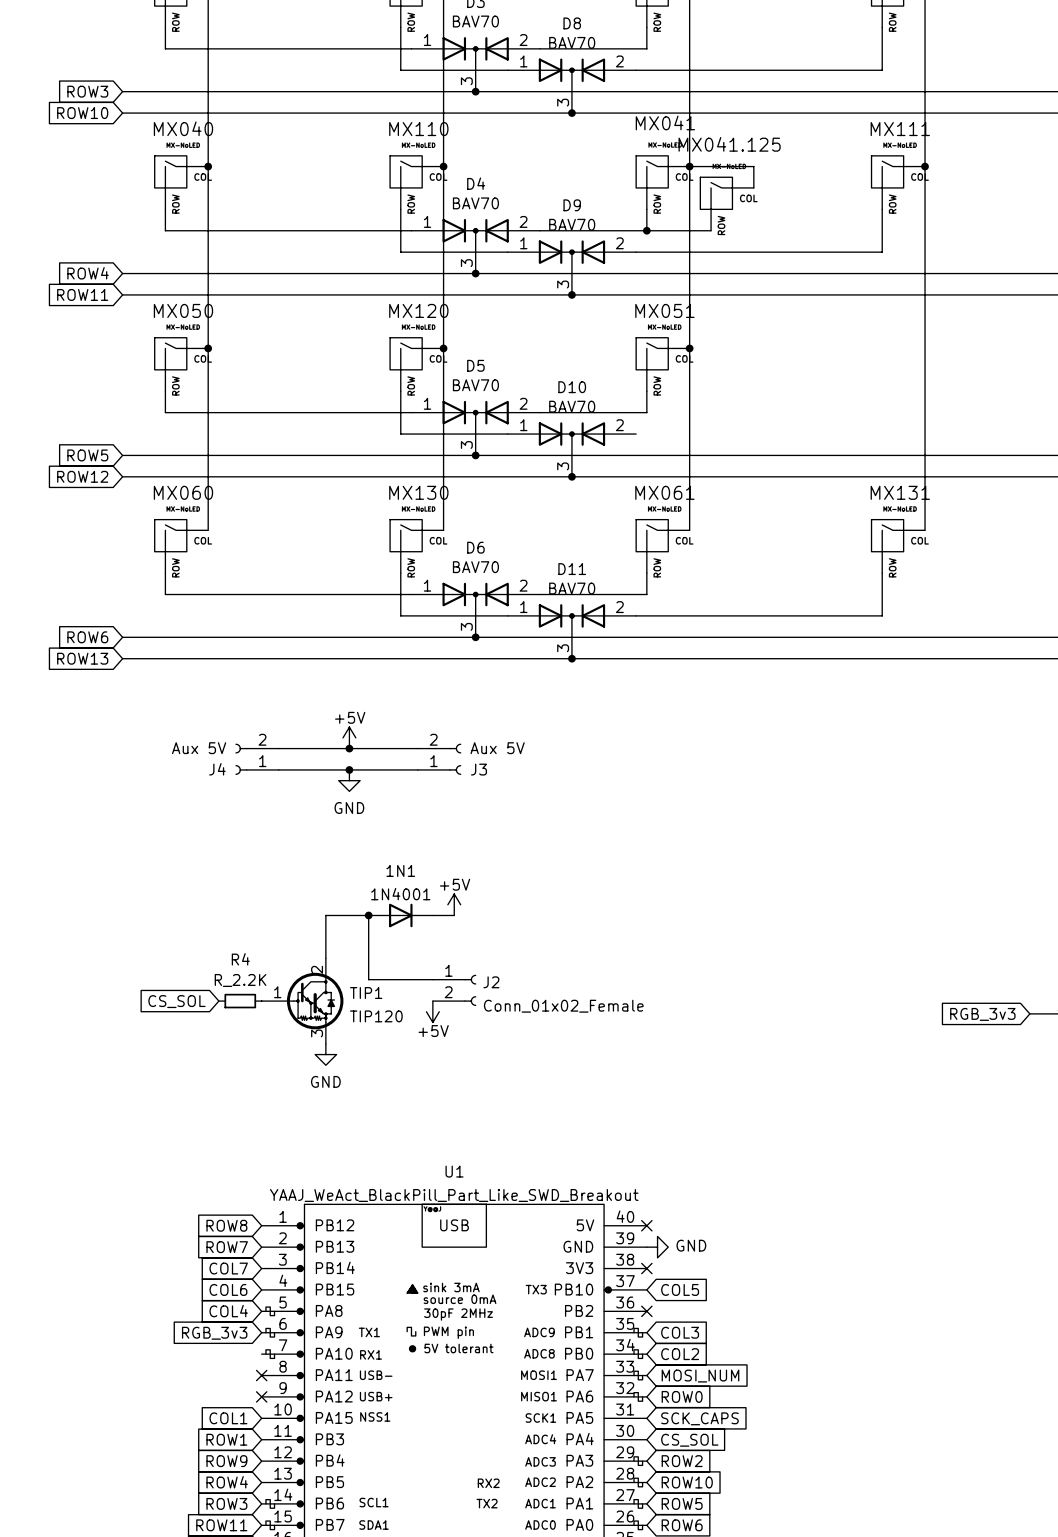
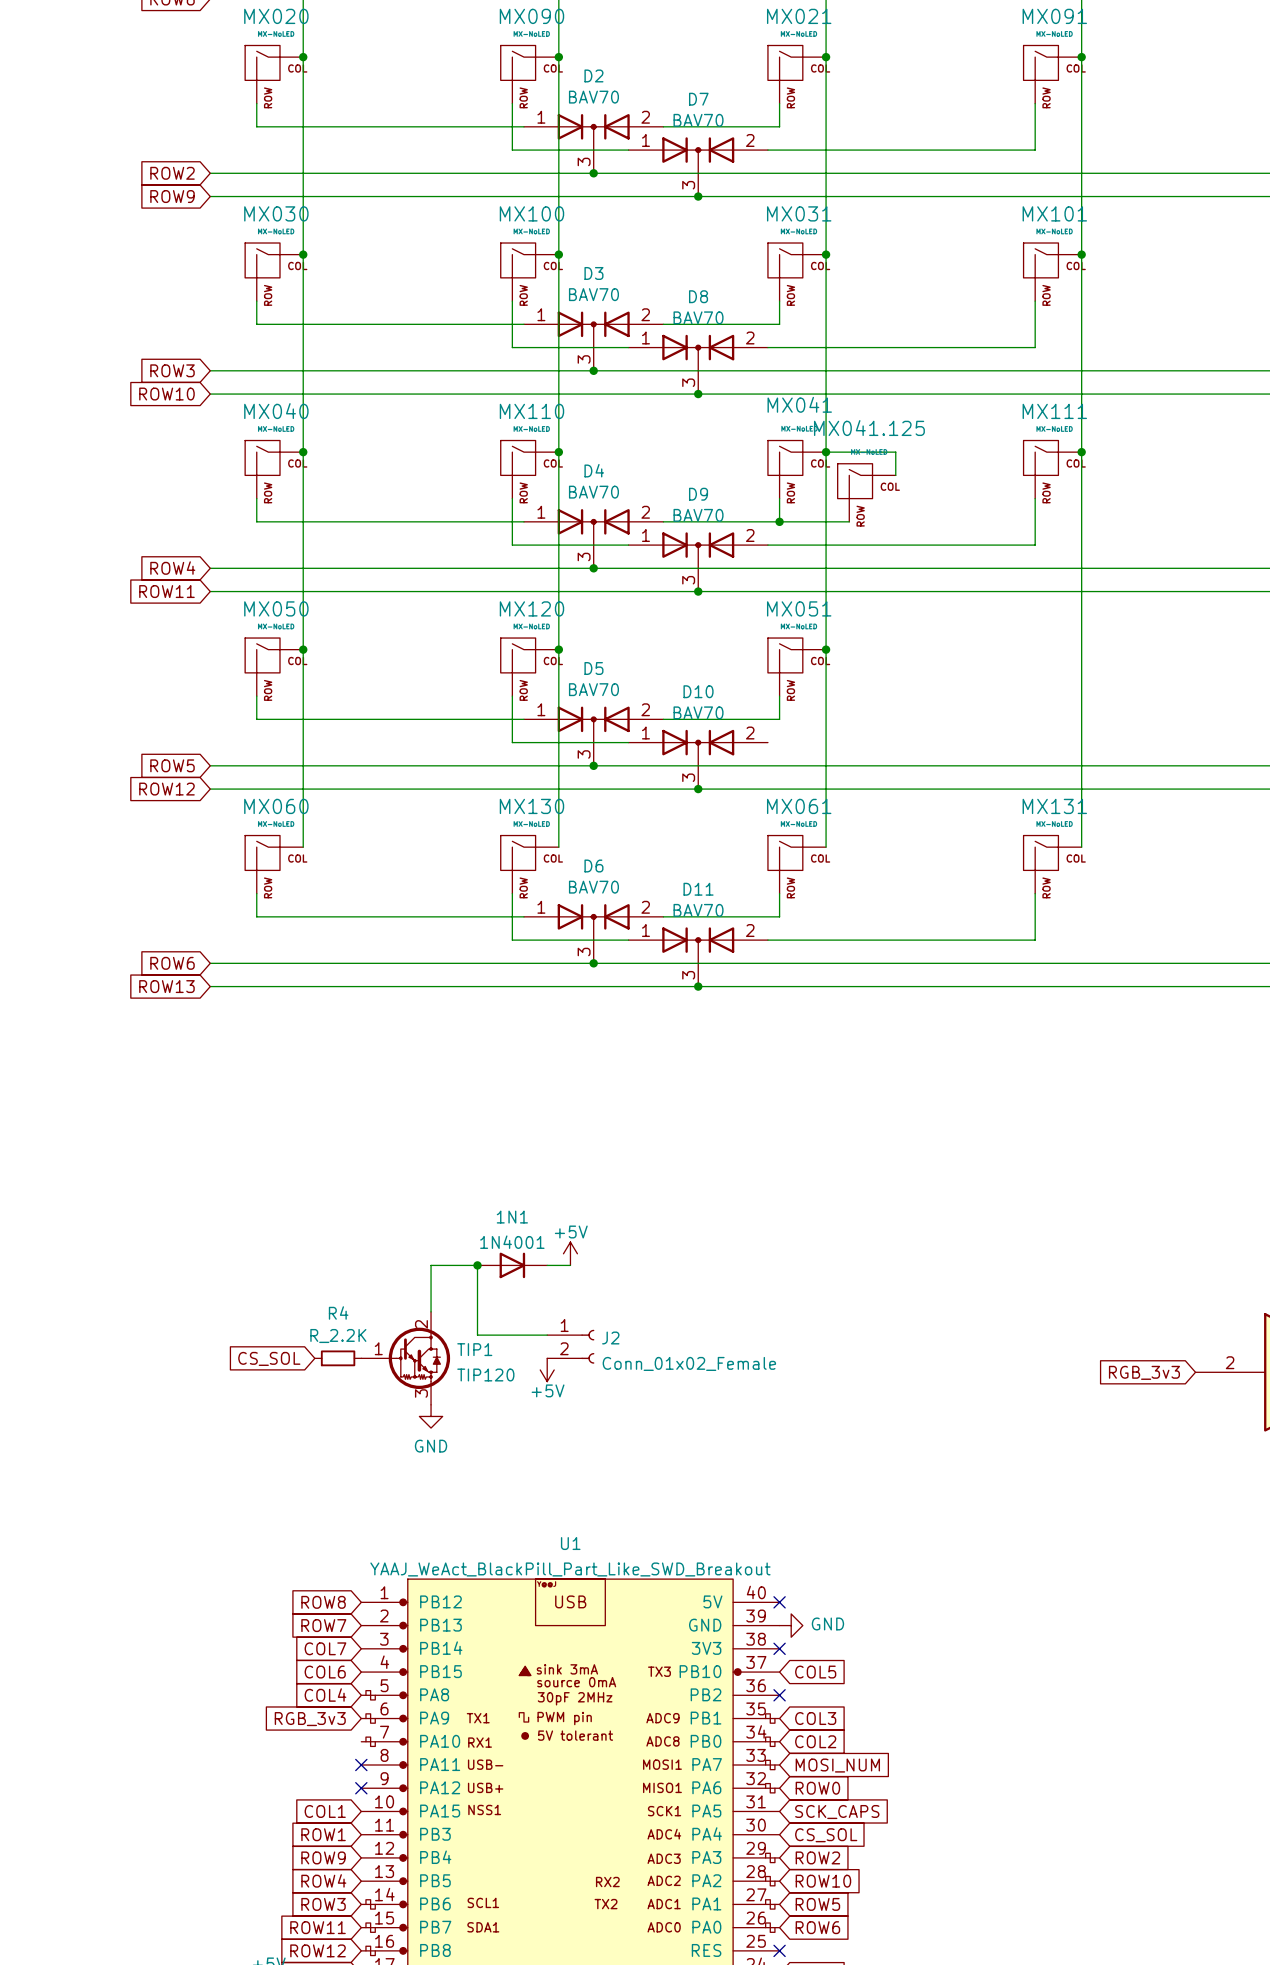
power symbol: +5V (349, 737) -> none
wire: (278, 748) (417, 748) -> none
junction: (349, 748) -> none
J4: Aux 5V (257, 759) -> none
J3: Aux 5V (439, 759) -> none
wire: (278, 769) (417, 769) -> none
junction: (349, 769) -> none
power symbol: GND (349, 780) -> none

